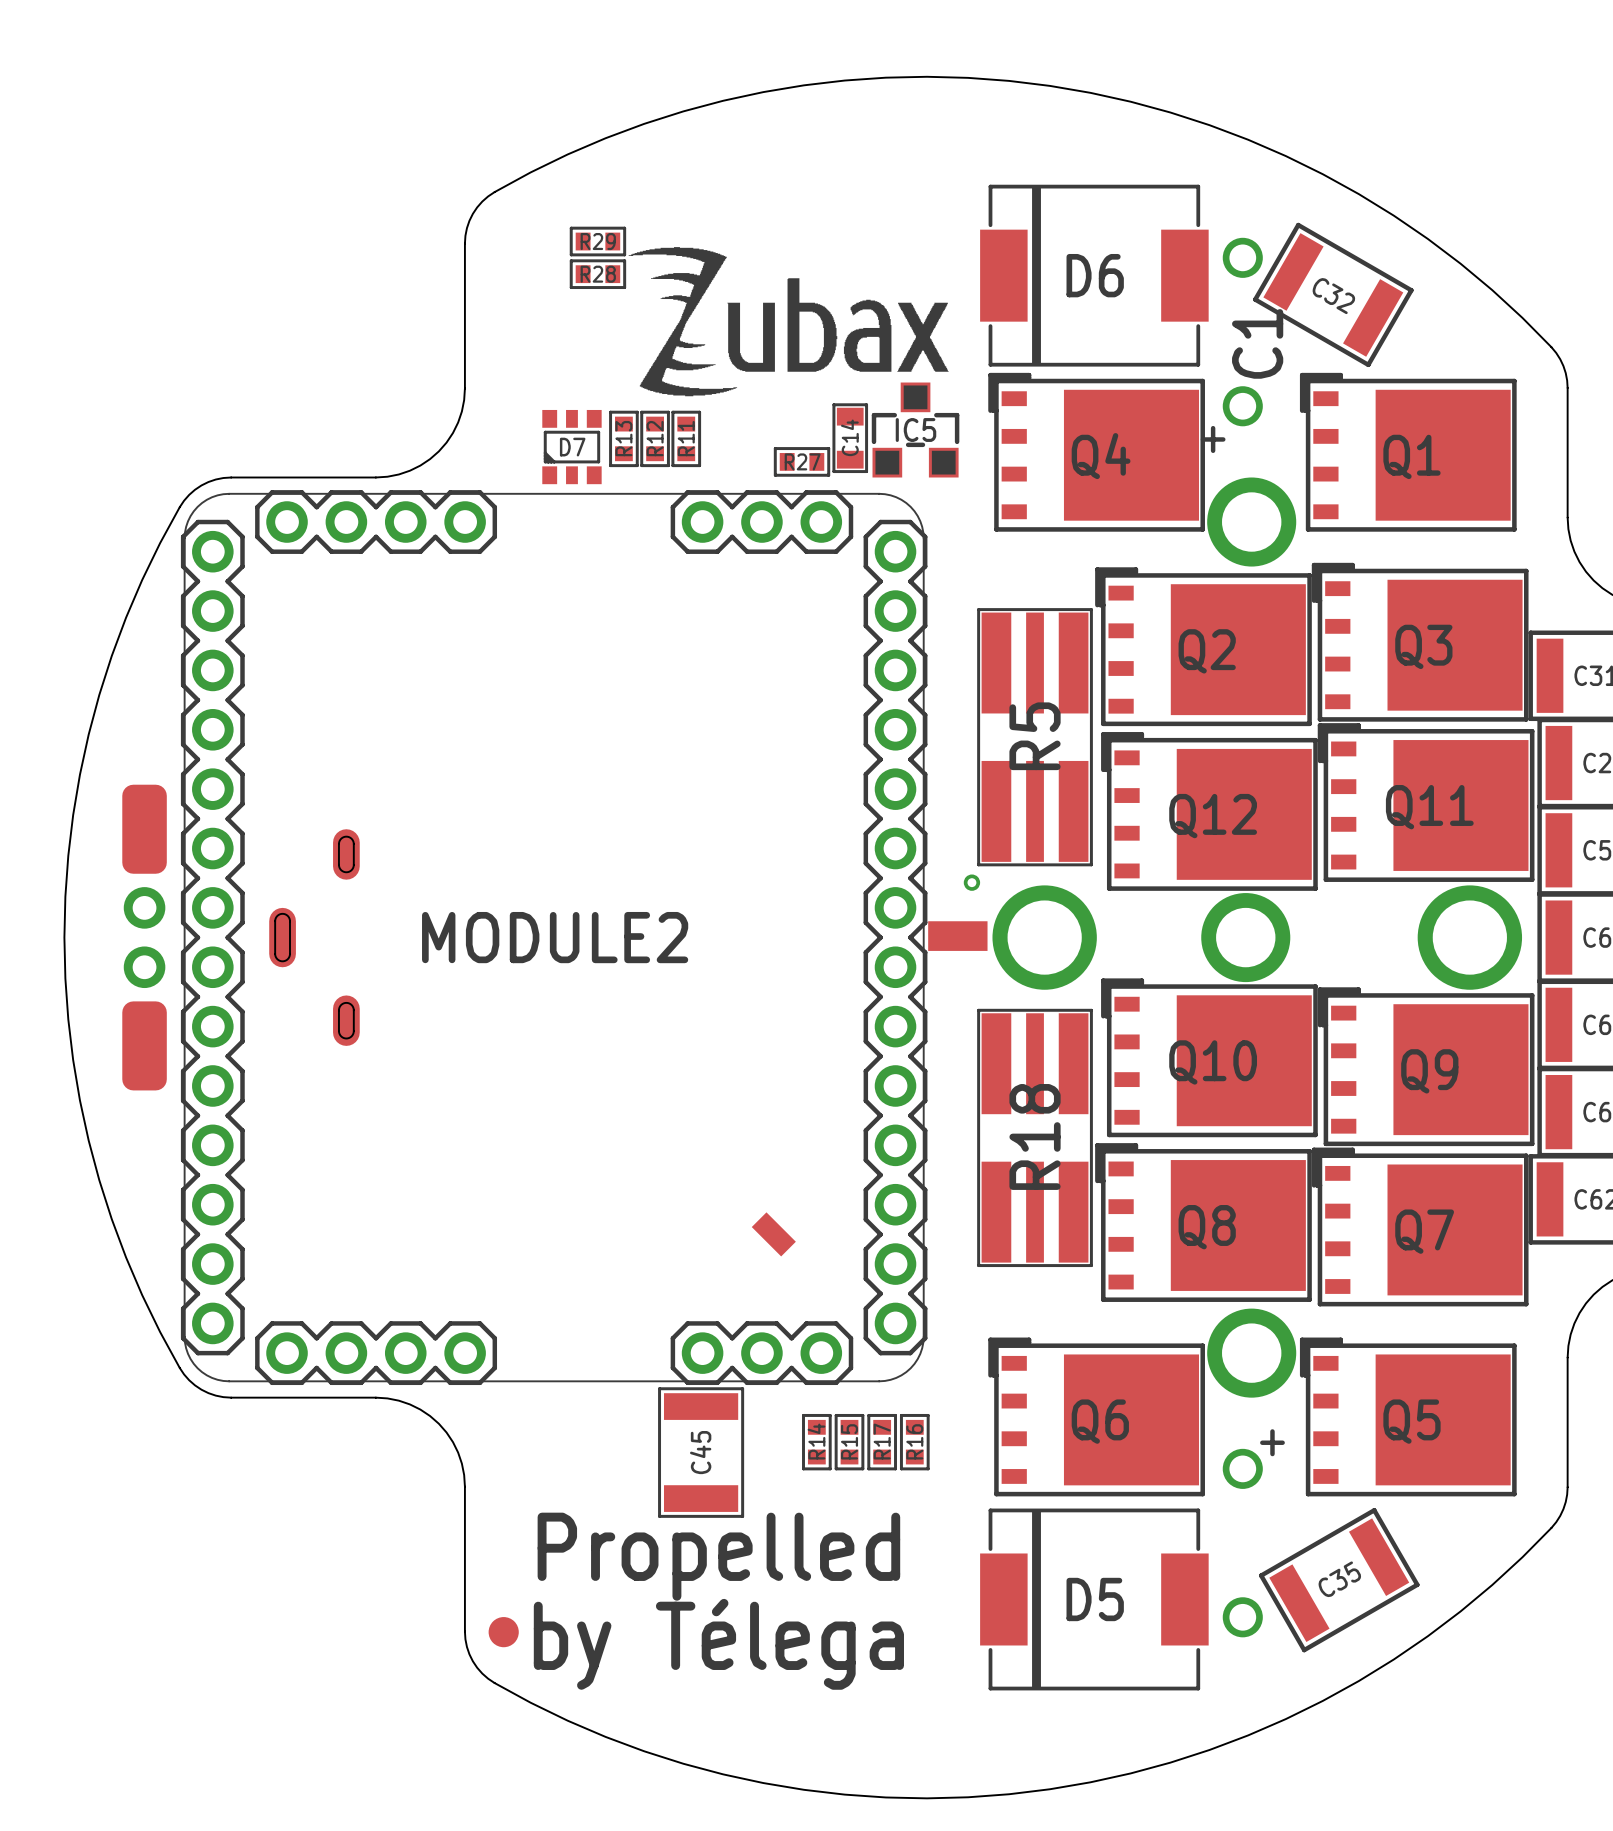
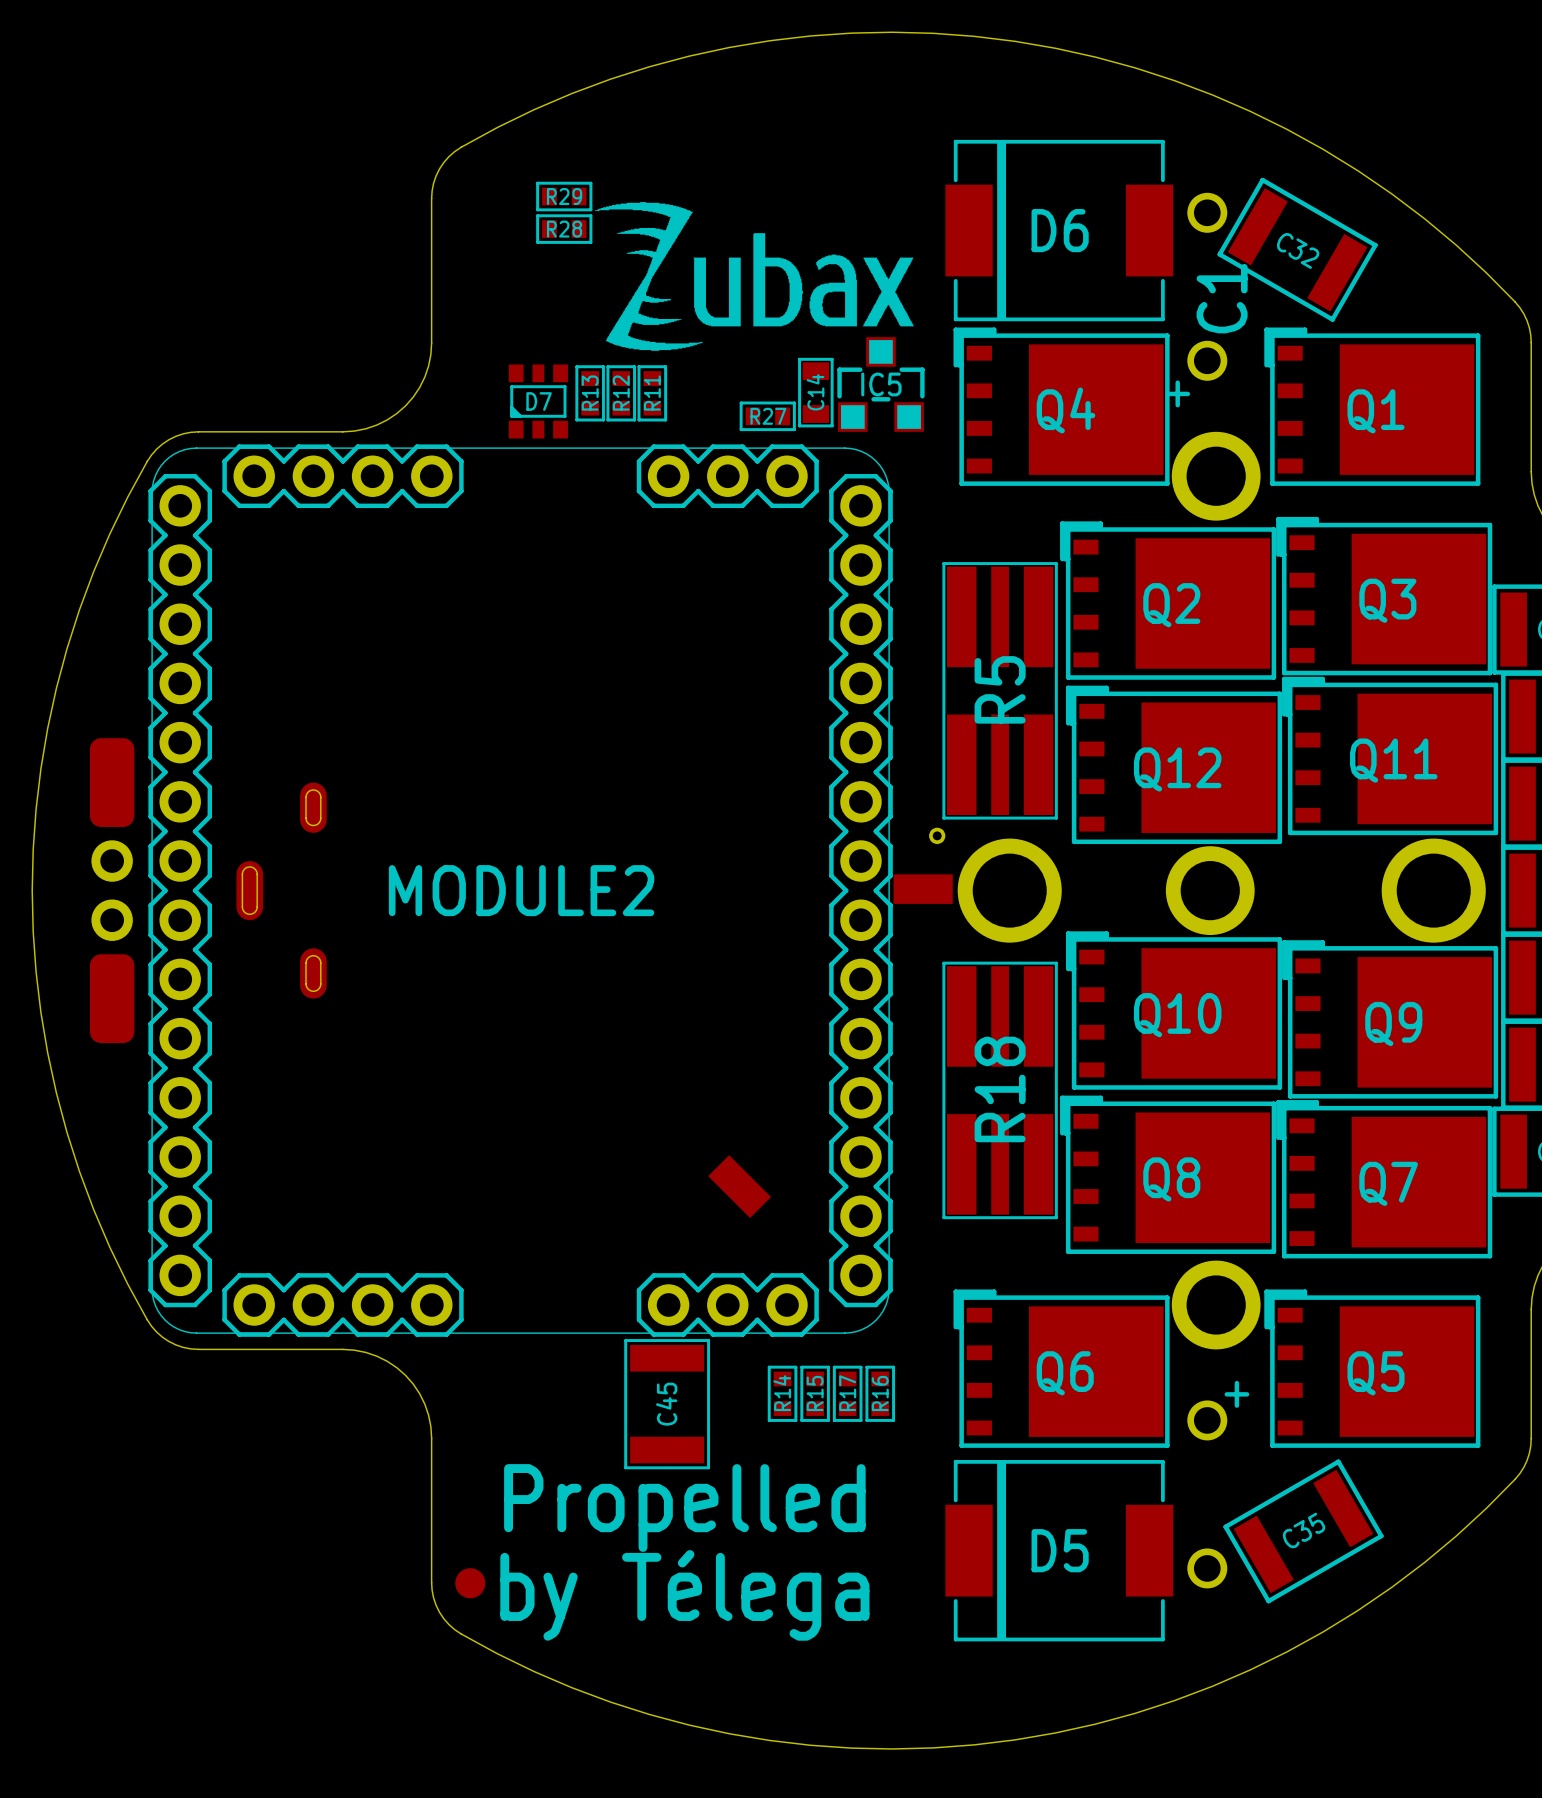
part footprint: [751, 1212, 796, 1257] -> [708, 1155, 772, 1219]

